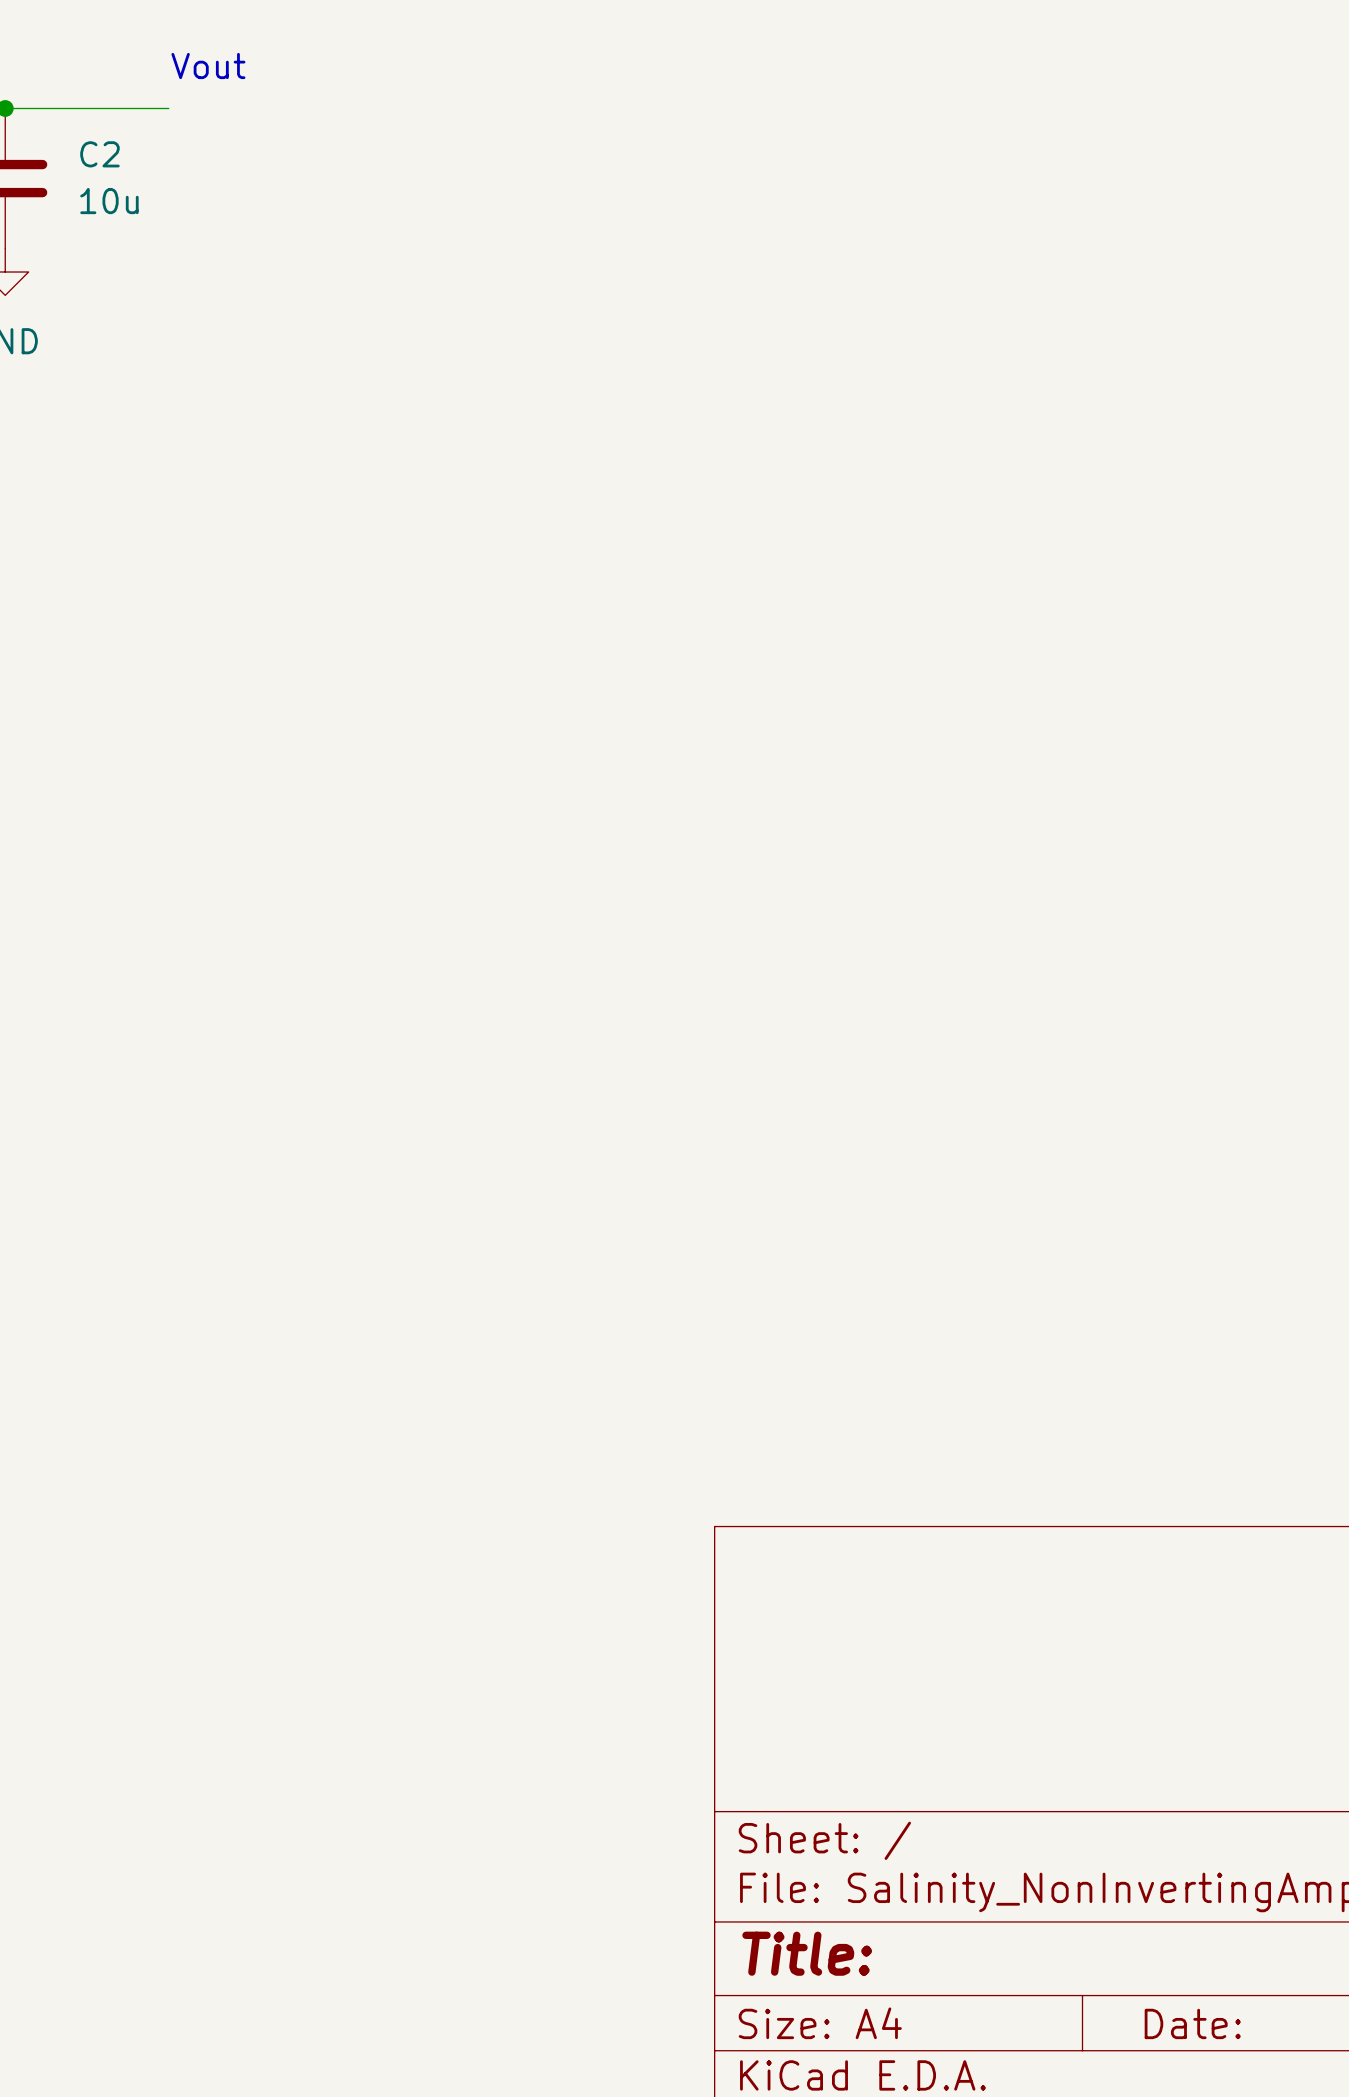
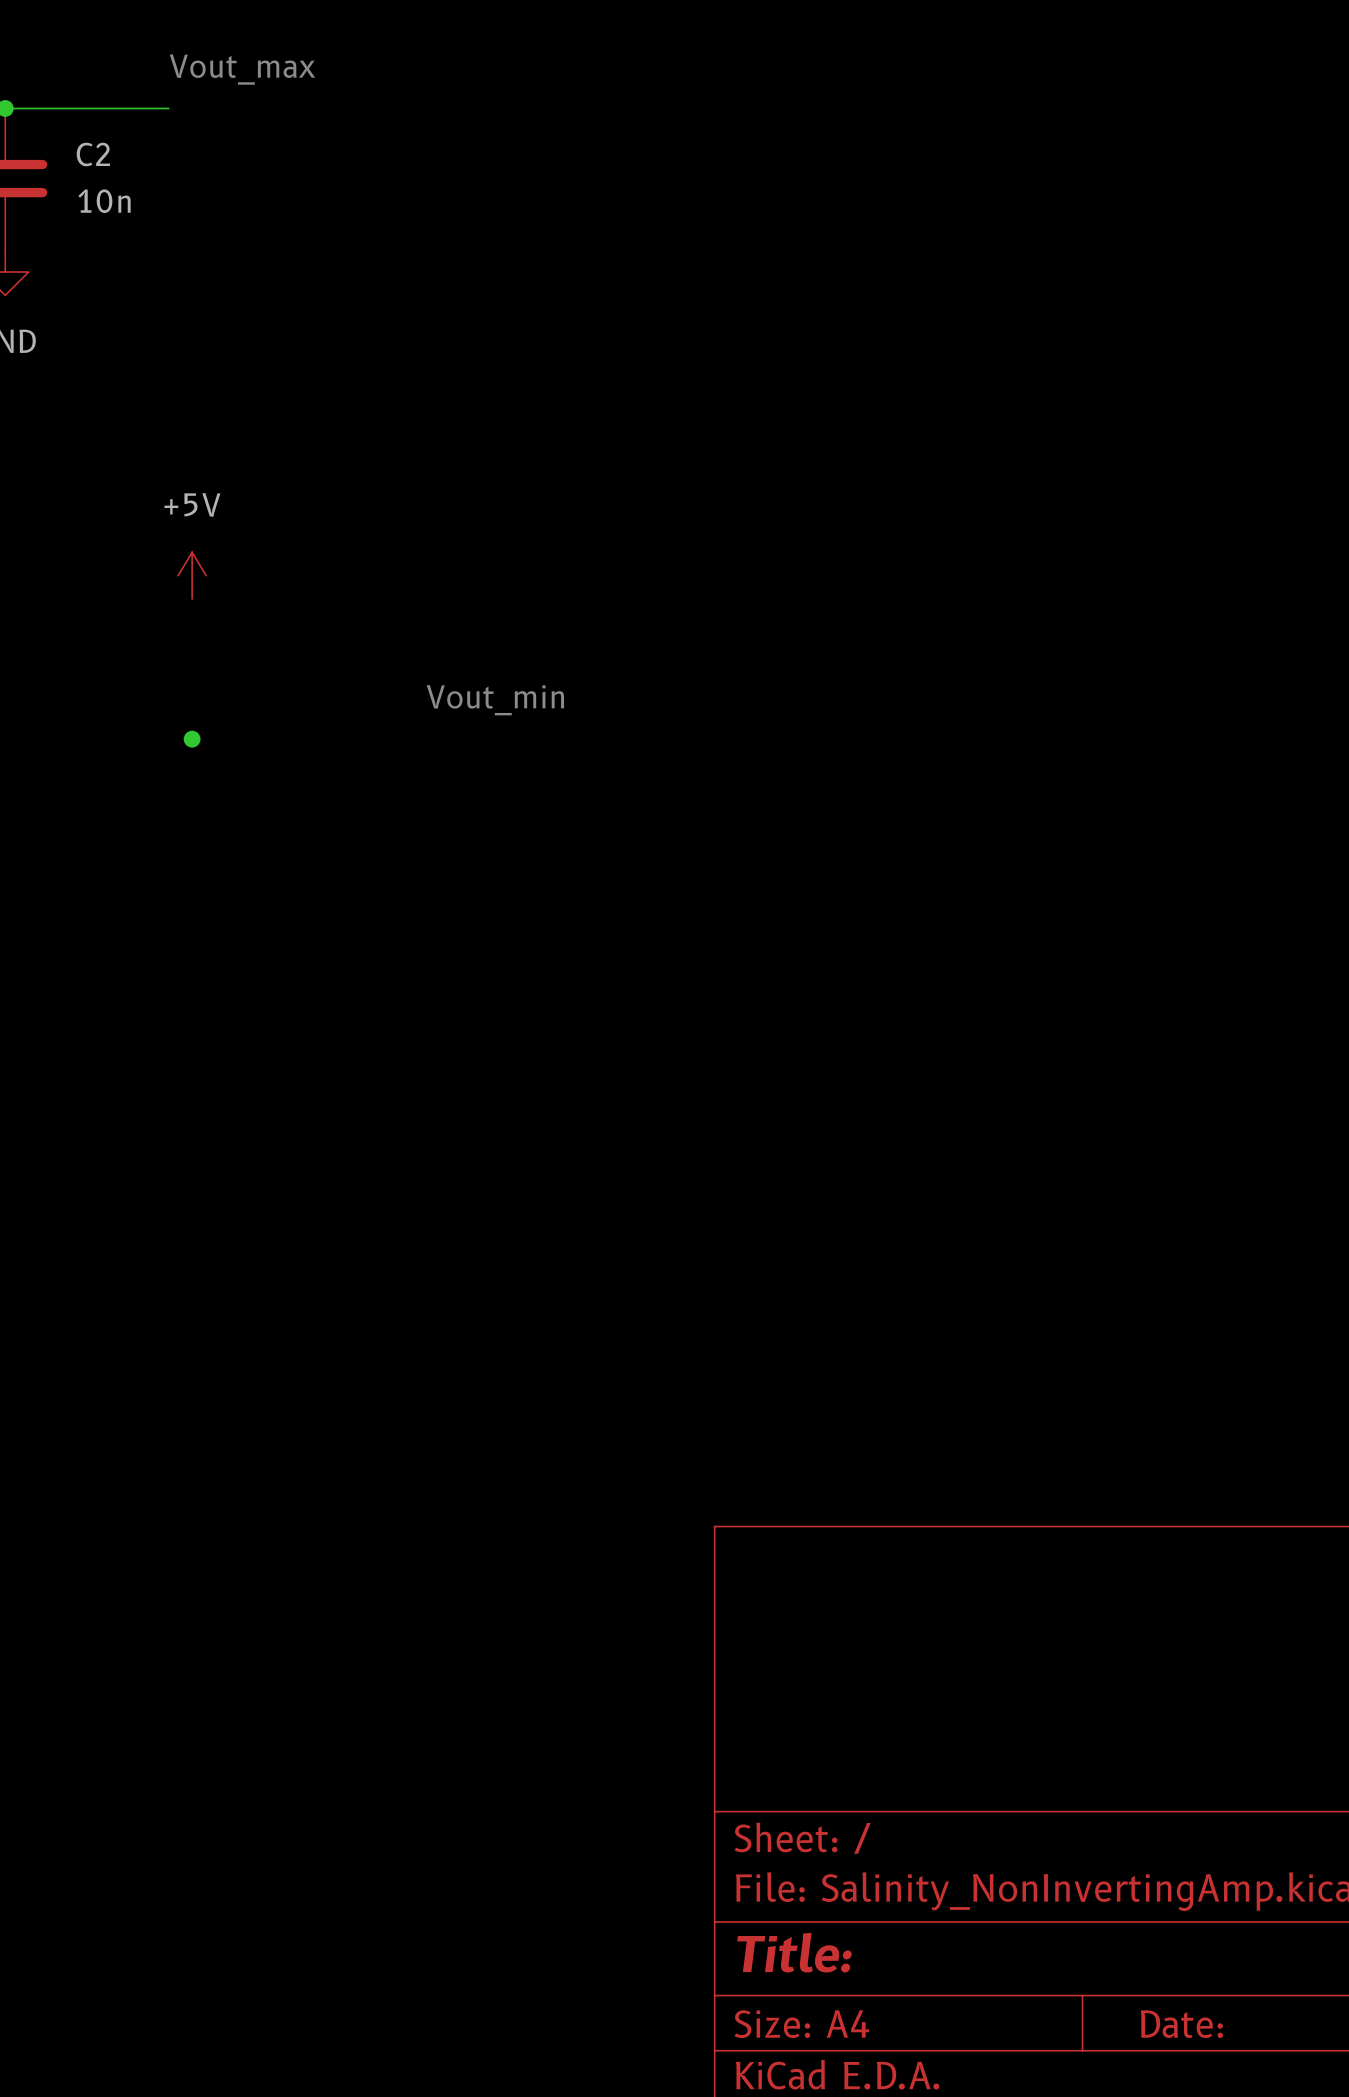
text: Vout (208, 66) -> Vout_max (242, 69)
C2 value: 10u (109, 201) -> 10n (104, 201)
power symbol: none -> +5V (192, 575)
text: none -> Vout_min (495, 700)
junction: none -> (192, 739)

